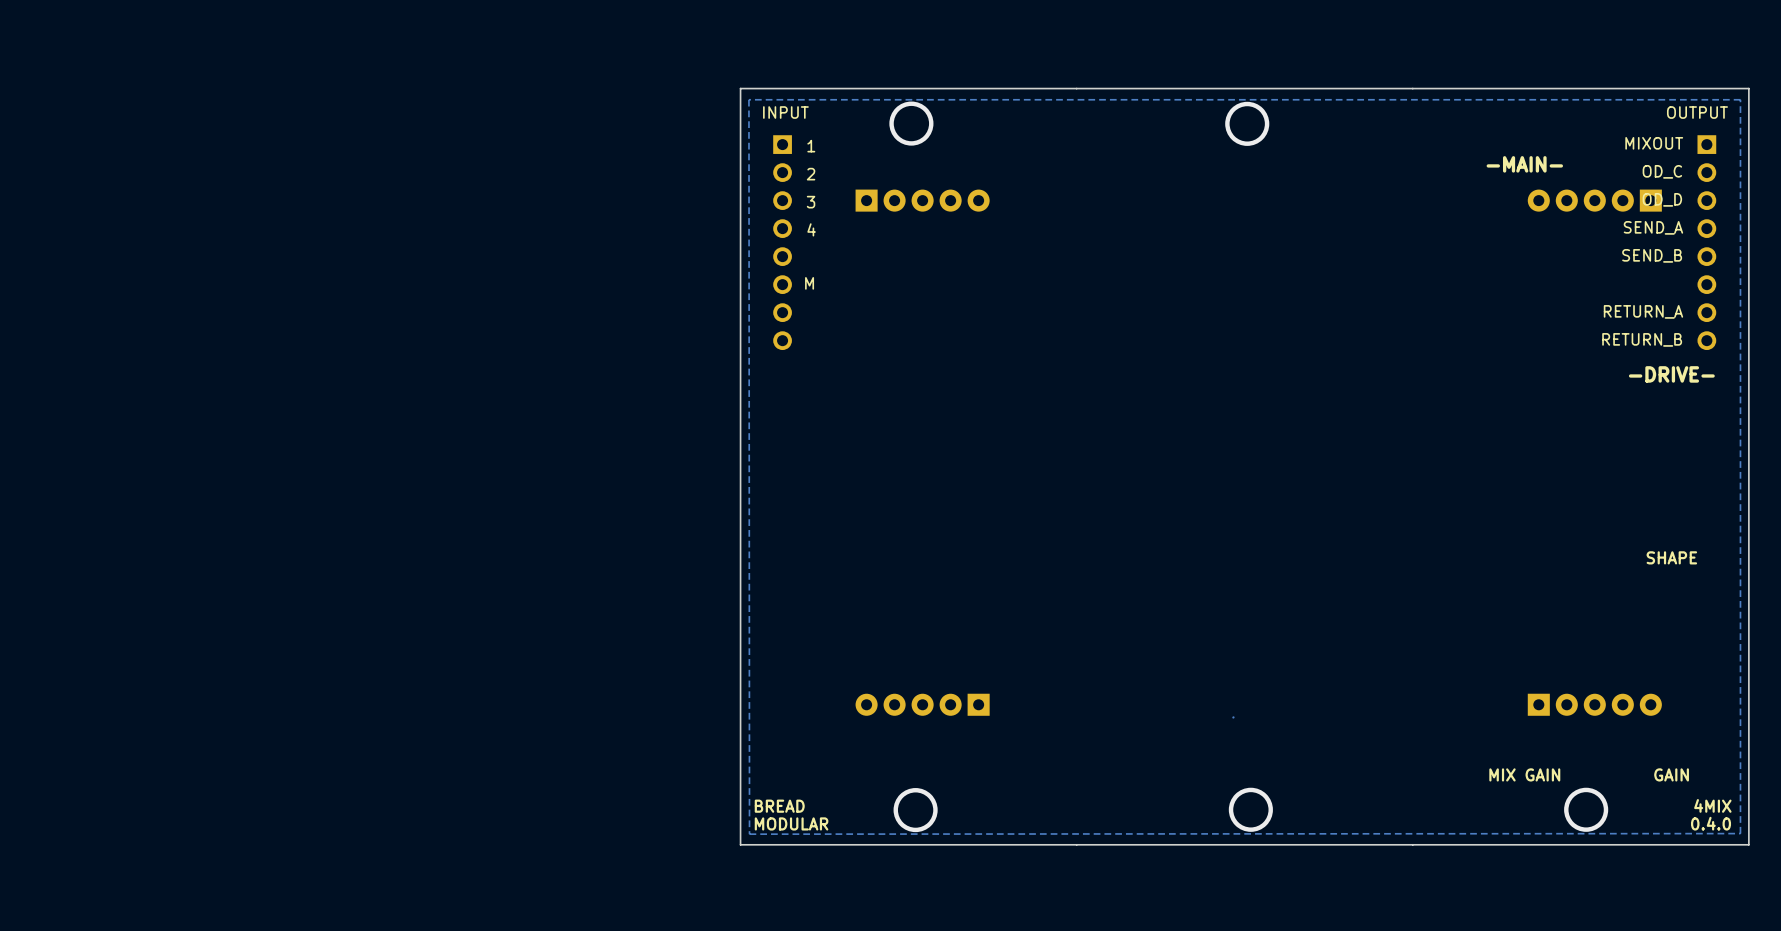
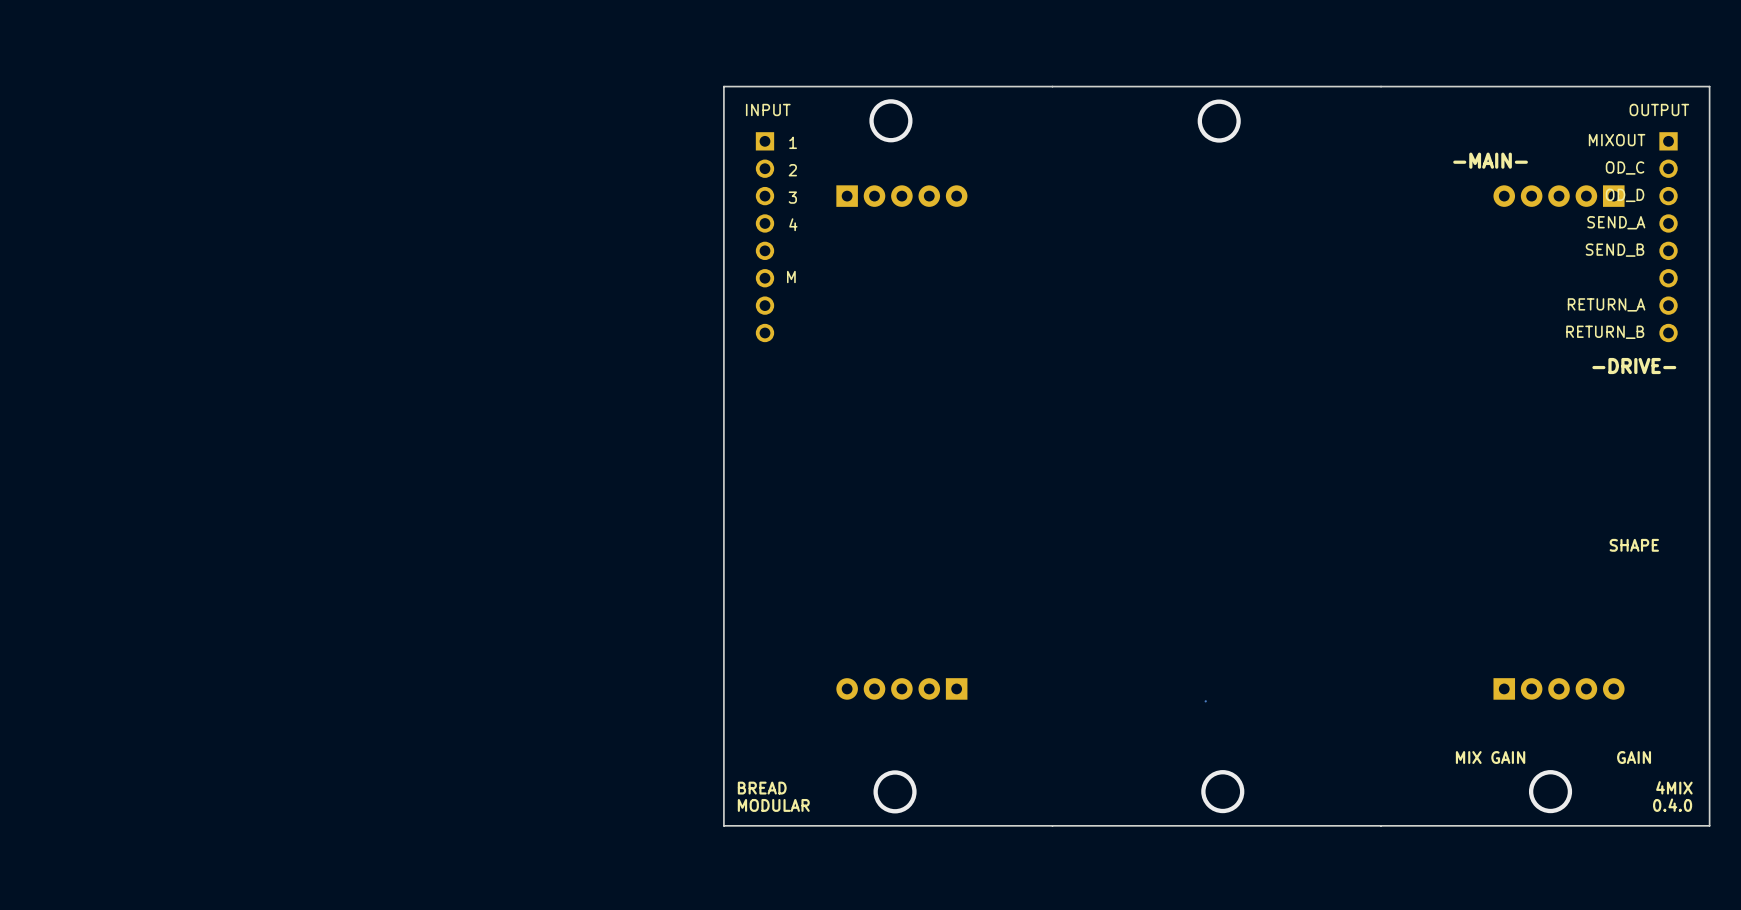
zone outline: (1740, 99) (1740, 833) (749, 834) (748, 99) (1740, 99) -> none

